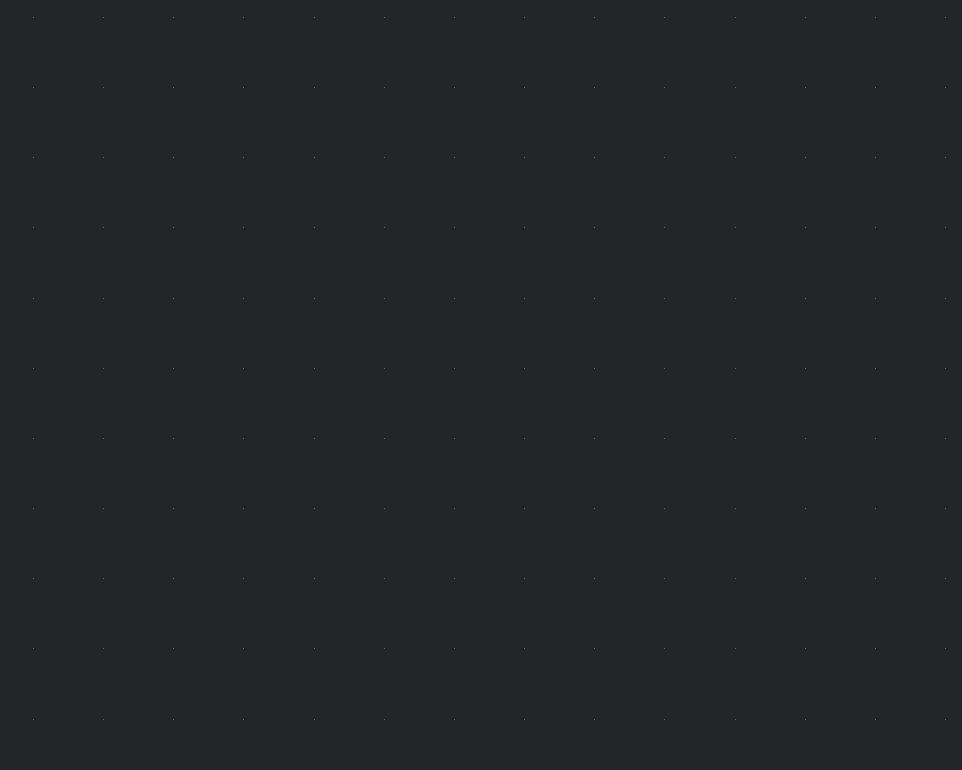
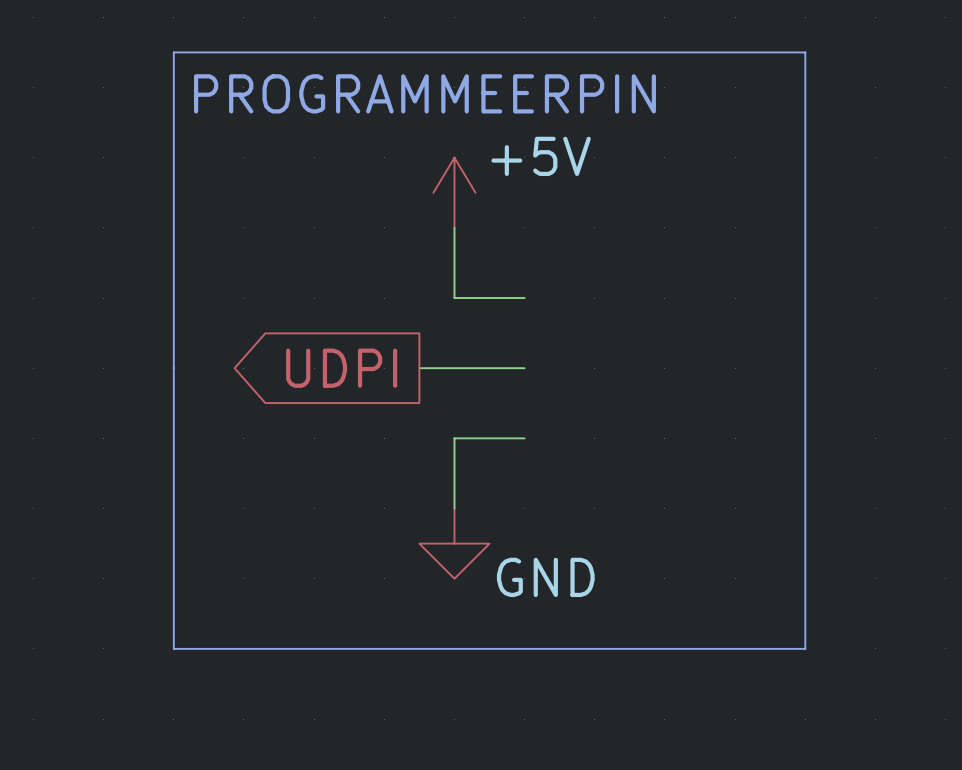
line: none -> (173, 52) (173, 648) (805, 648) (805, 52) (173, 52)
text: none -> PROGRAMMEERPIN (424, 93)
power symbol: none -> +5V (454, 192)
wire: none -> (454, 227) (454, 298) (524, 298)
global label: none -> UDPI (341, 368)
wire: none -> (419, 368) (524, 368)
wire: none -> (524, 438) (454, 438) (454, 508)
power symbol: none -> GND (454, 543)

